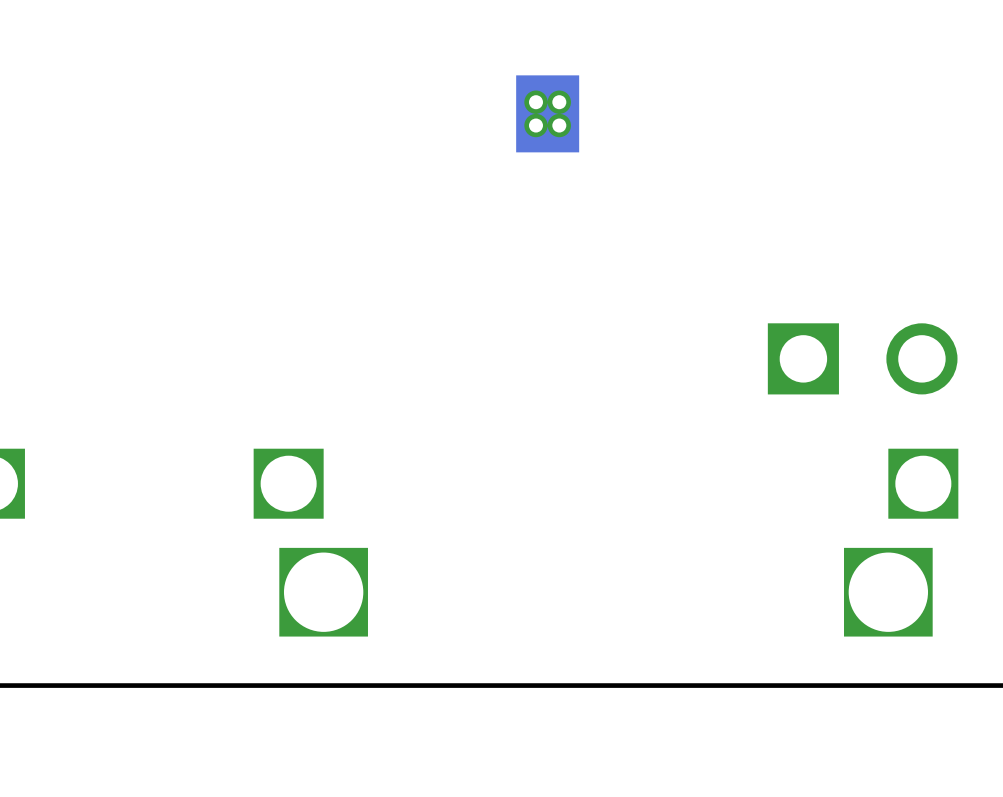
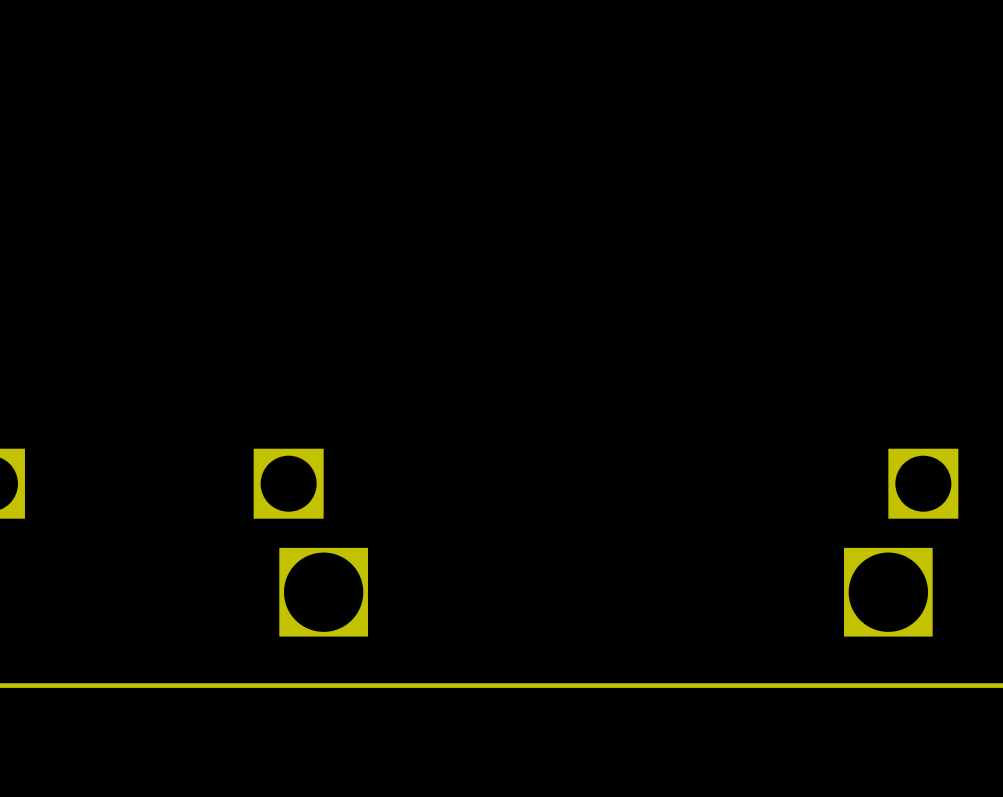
part: (547, 113) -> none
part: (862, 358) -> none

